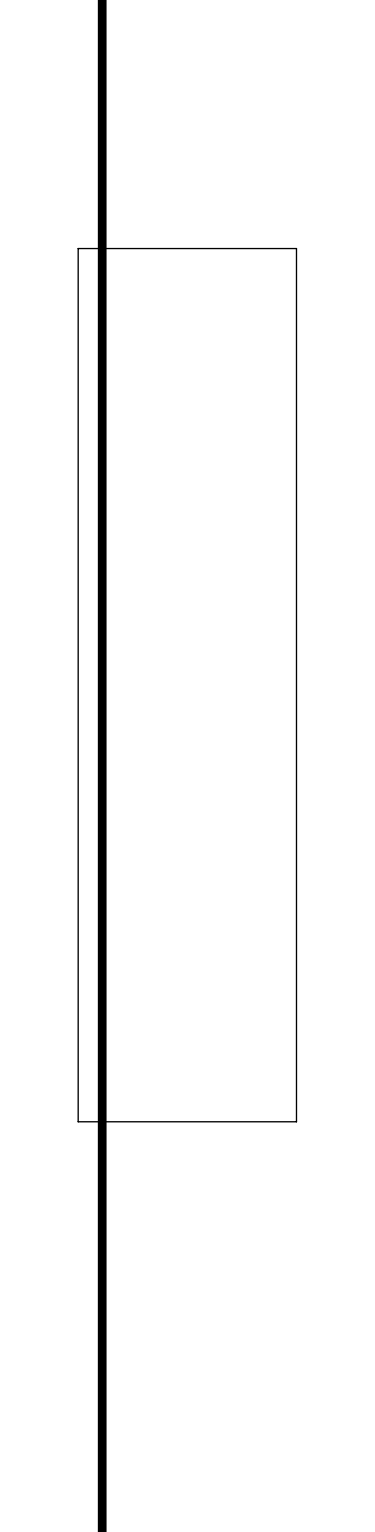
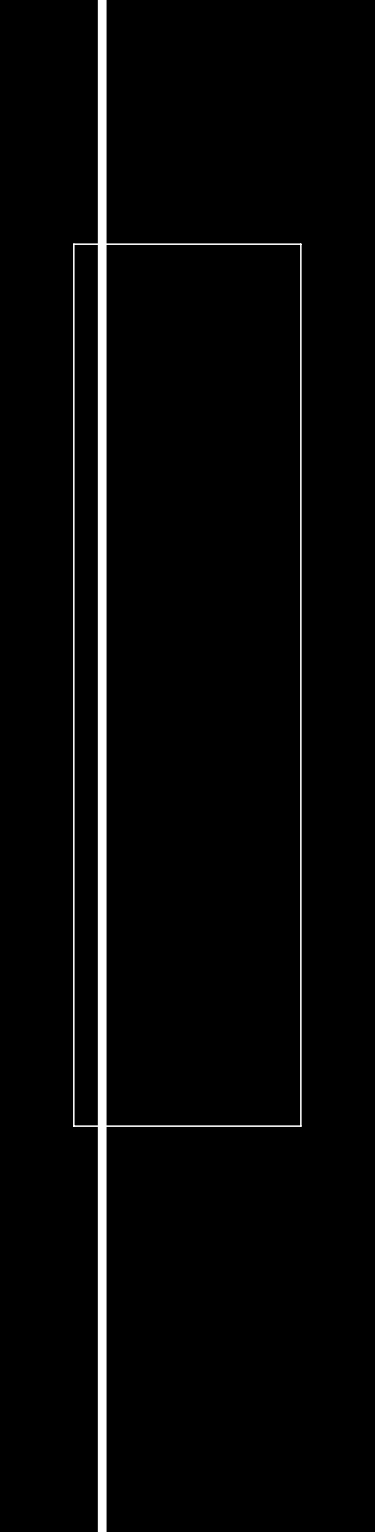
drawing shape: [77, 248, 297, 1123] -> [73, 243, 302, 1127]

